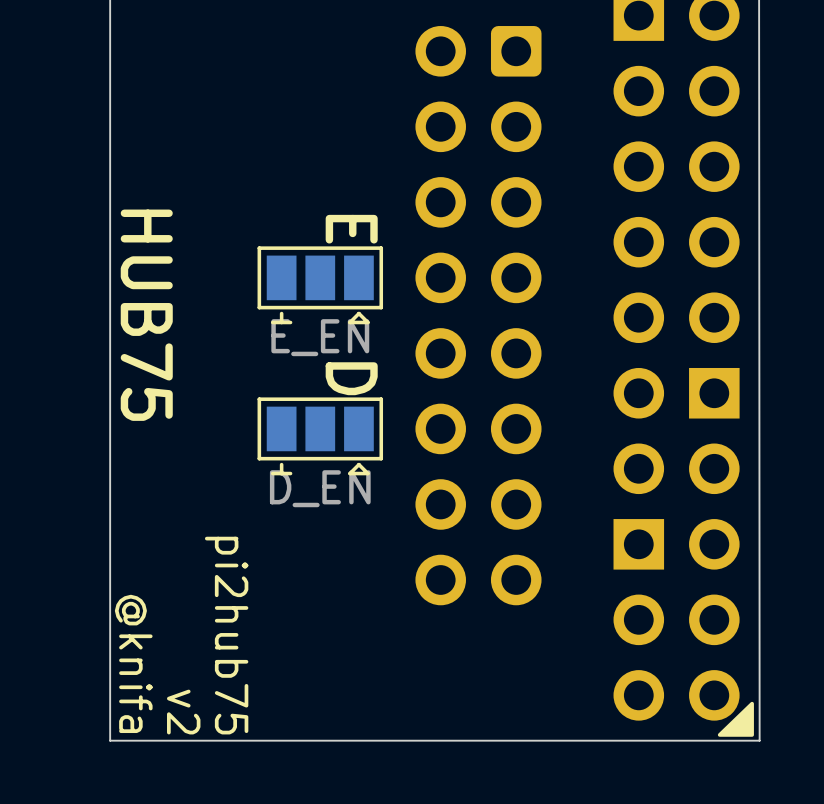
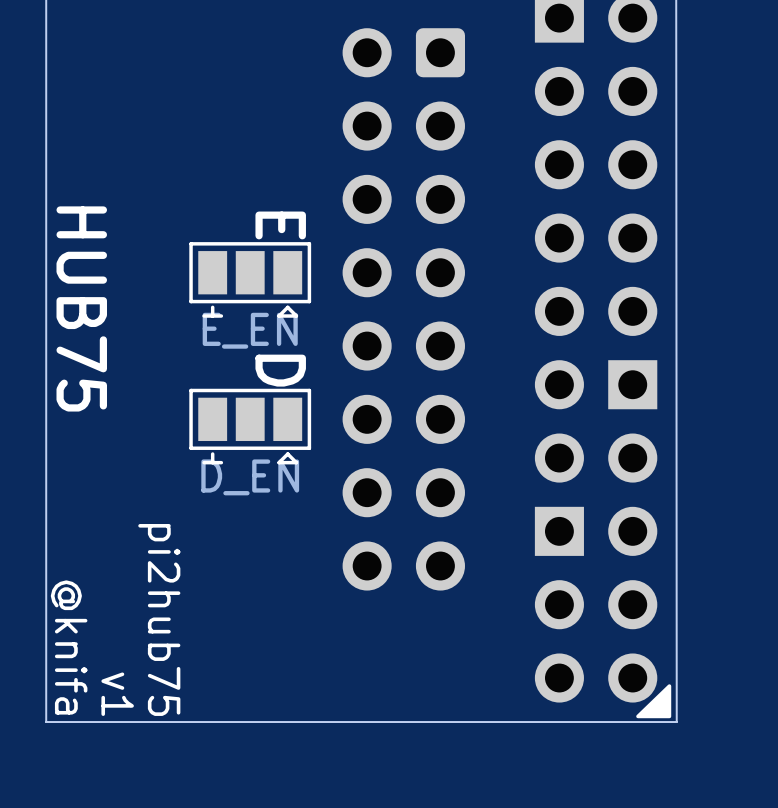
text: v2 (183, 712) -> v1 (117, 694)

